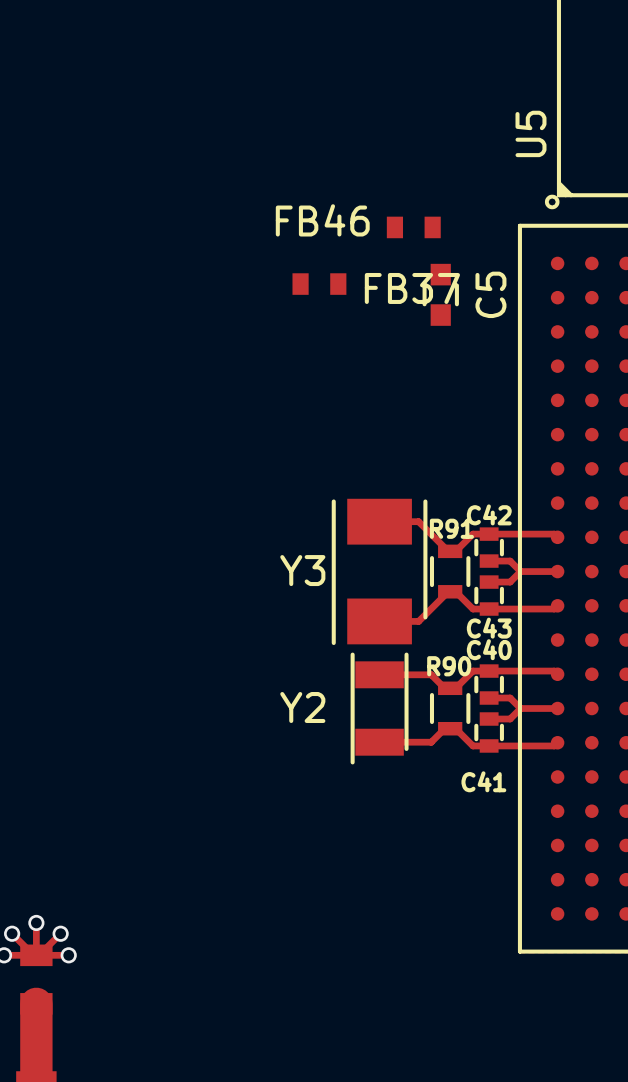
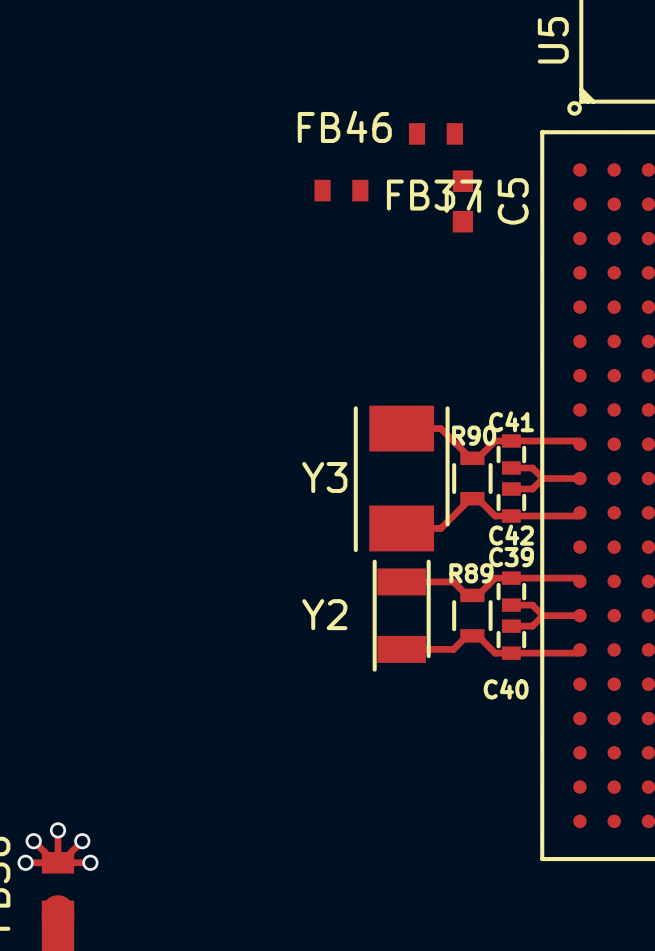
C42 name: C42 (489, 514) -> C41 (511, 421)
R91 name: R91 (451, 528) -> R90 (474, 435)
C43 name: C43 (489, 628) -> C42 (511, 535)
C40 name: C40 (489, 649) -> C39 (511, 557)
R90 name: R90 (449, 666) -> R89 (471, 573)
C41 name: C41 (483, 781) -> C40 (506, 689)

